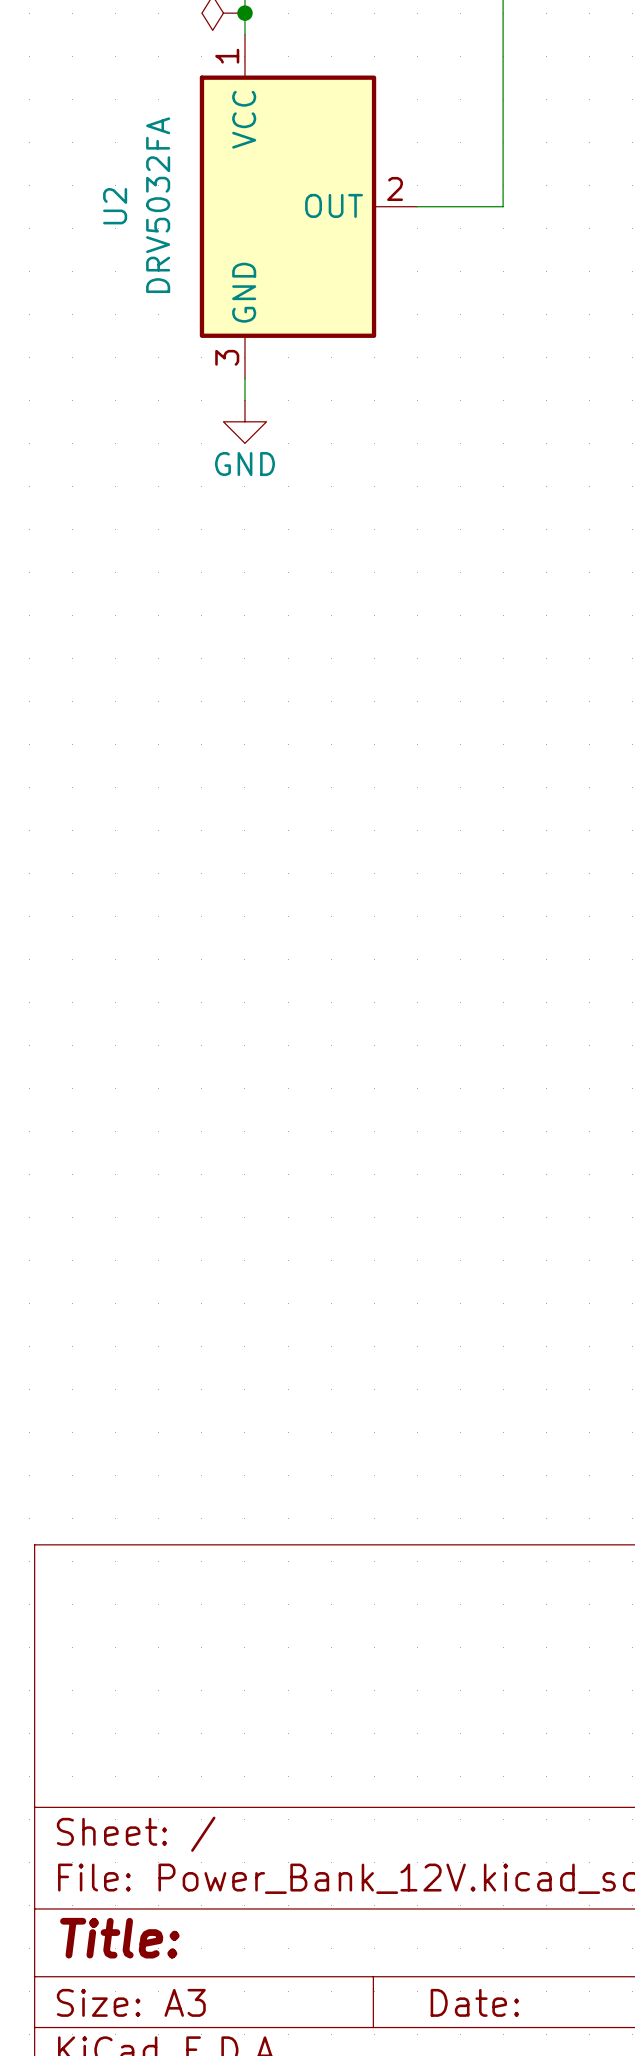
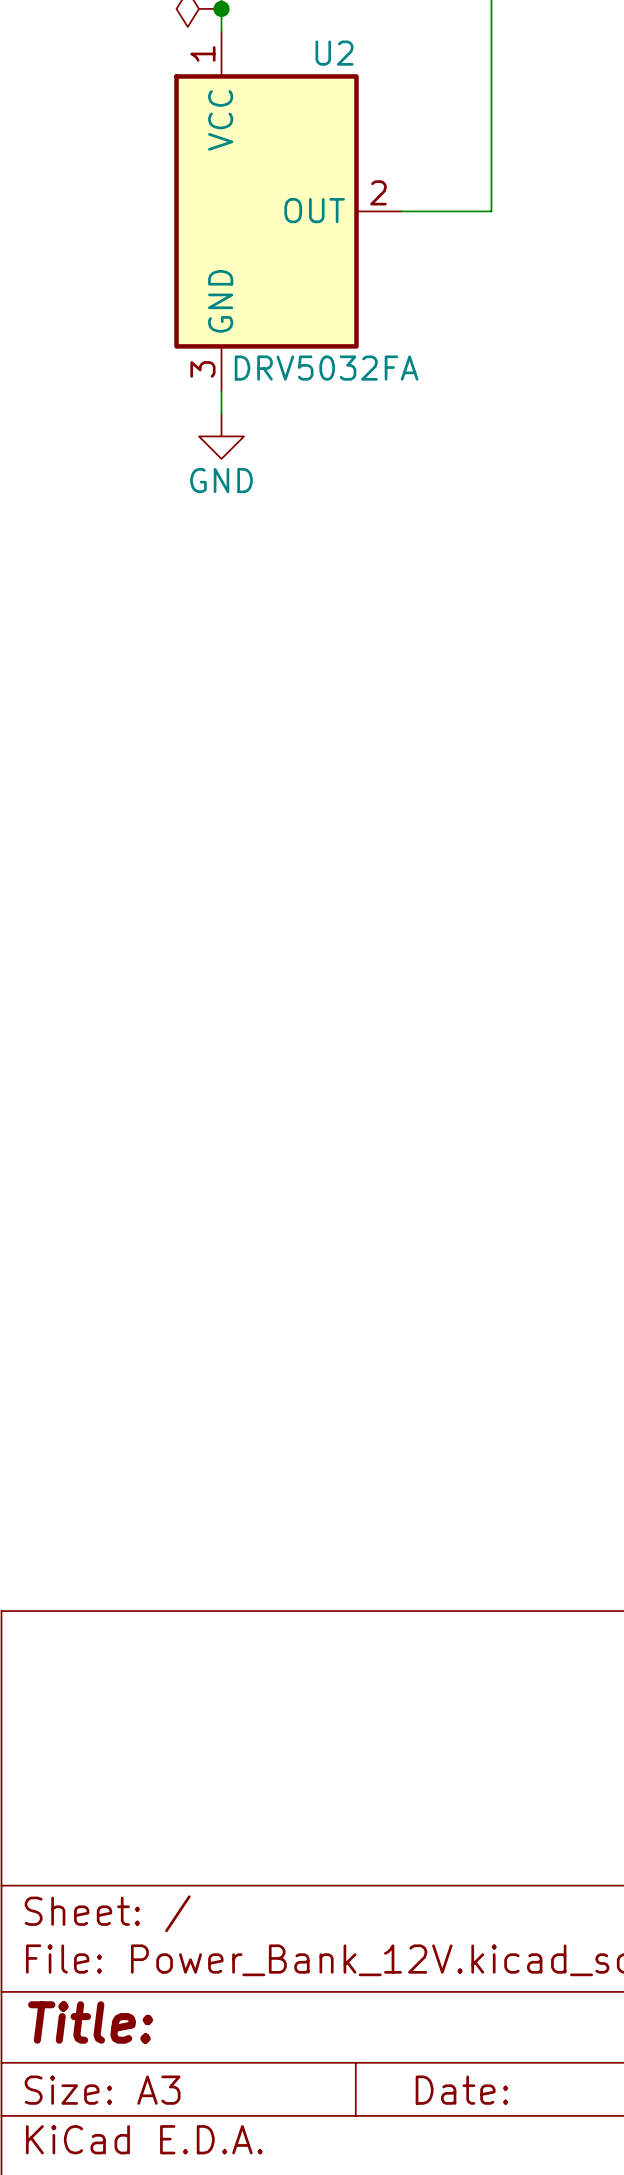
U2 value rotation: 0° (158, 205) -> 90° clockwise (326, 368)
U2 value position: DRV5032FA (158, 205) -> DRV5032FA (326, 368)
U2 name rotation: 0° (115, 206) -> 90° clockwise (334, 53)
U2 name position: U2 (115, 206) -> U2 (334, 53)

